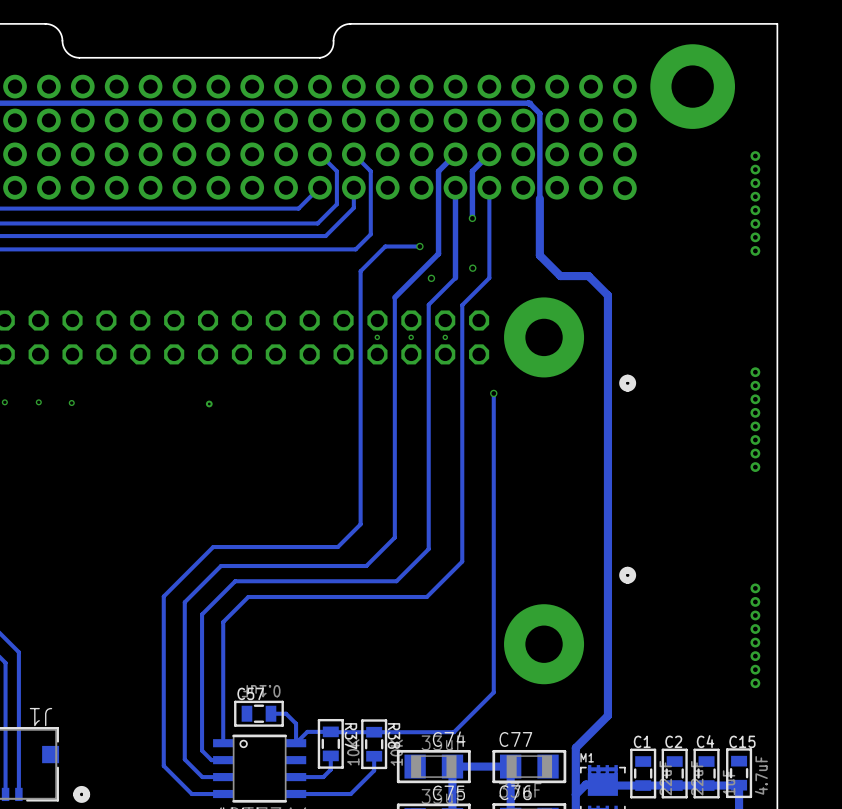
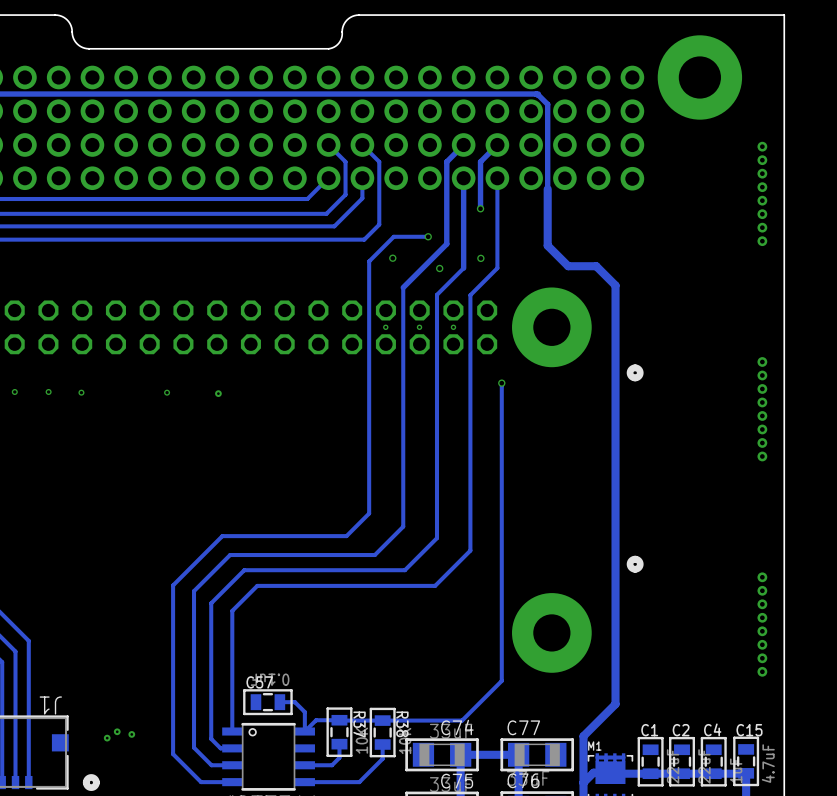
via: none -> (392, 258)
via: none -> (167, 392)
via: none -> (117, 731)
via: none -> (131, 734)
via: none -> (107, 738)

